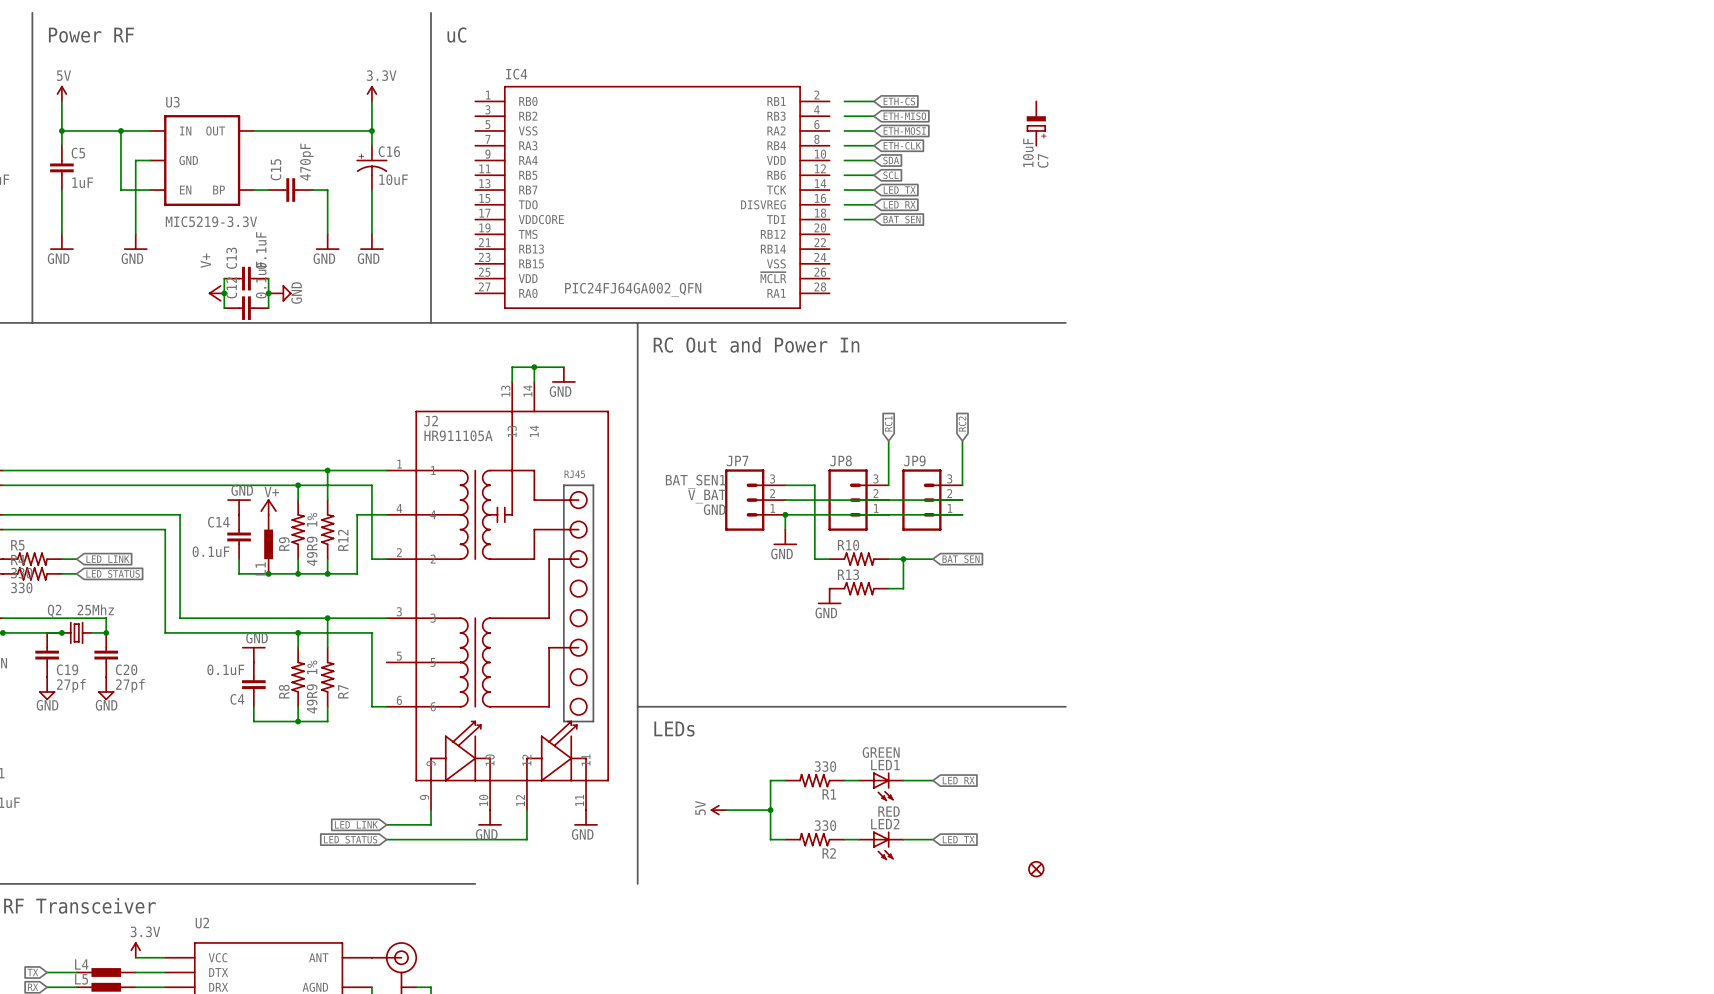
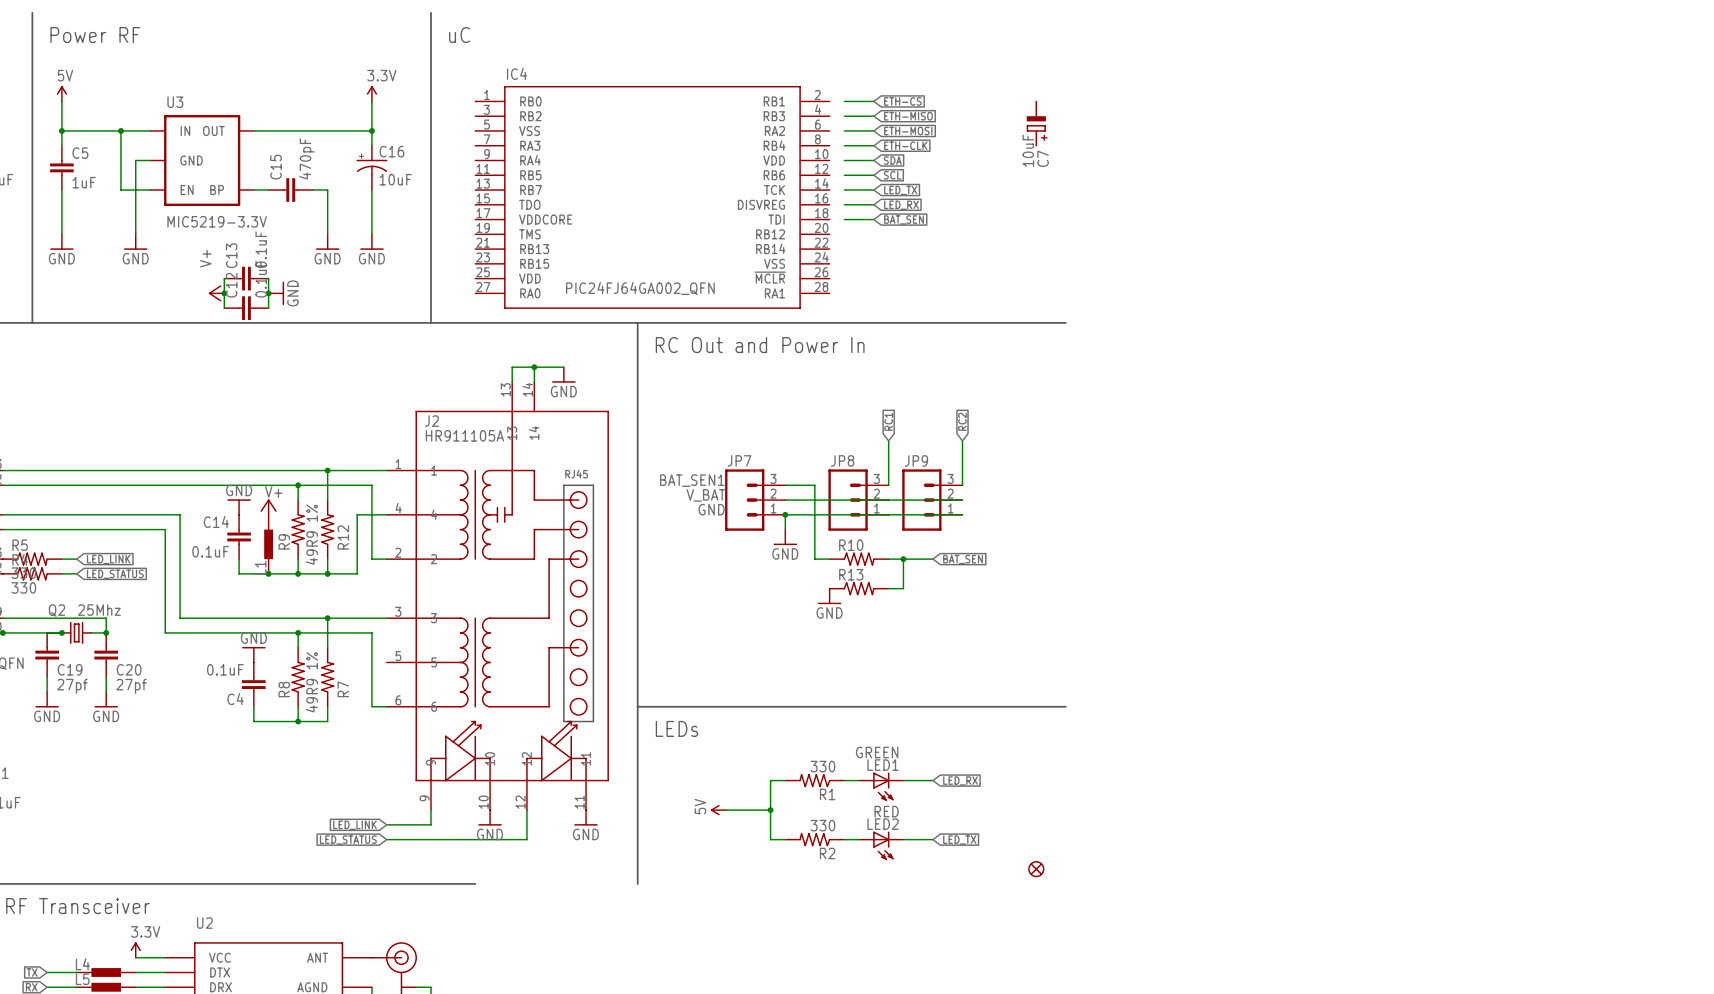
power symbol shape: [268, 285, 292, 302] -> [268, 281, 285, 306]
power symbol: GND (47, 688) -> none
power symbol: GND (106, 688) -> none
power symbol: none -> GND (47, 699)
power symbol: none -> GND (106, 699)

